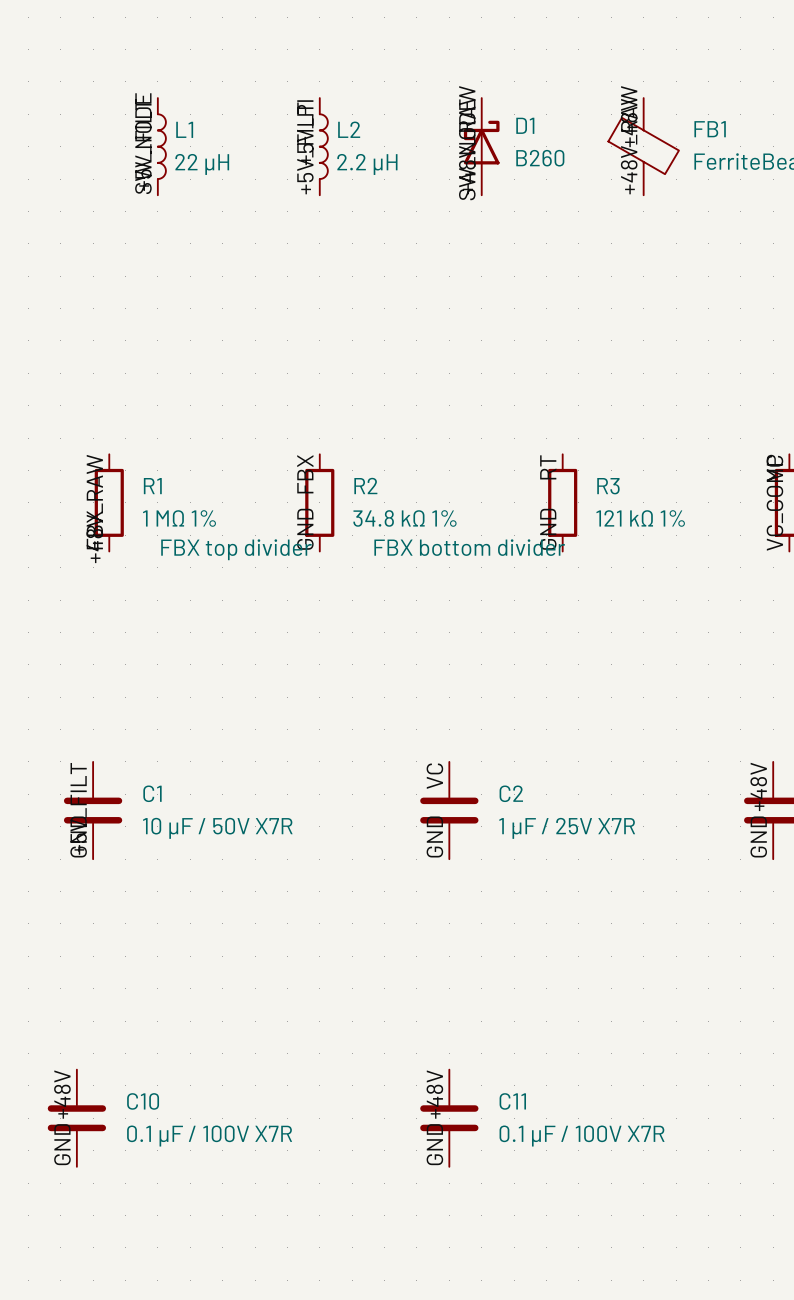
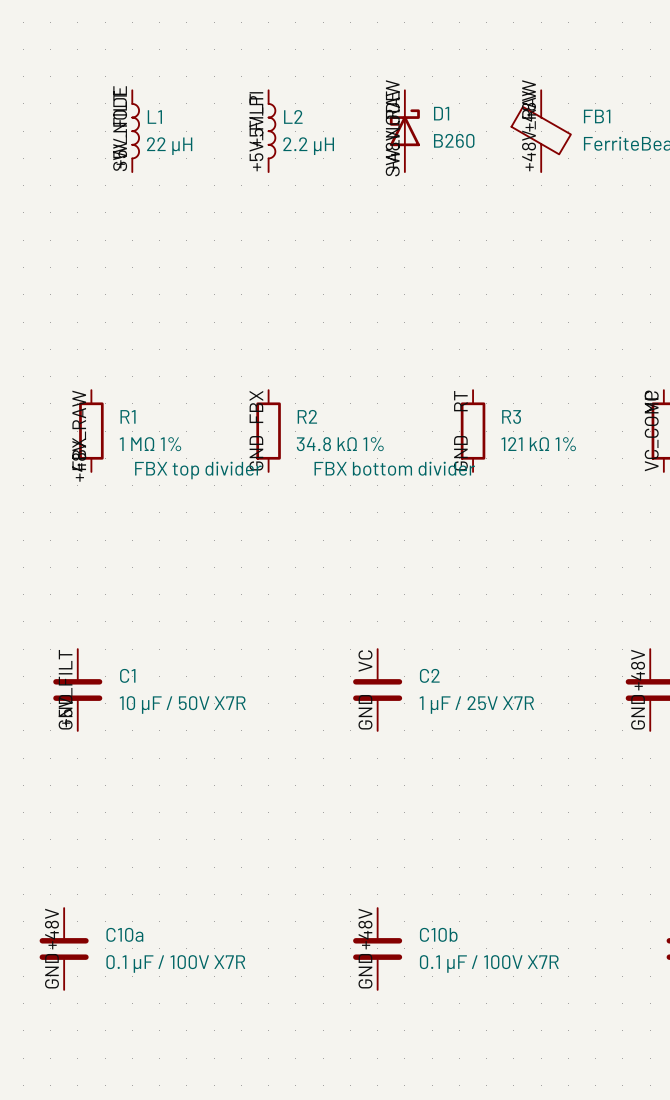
C10 name: C10 (143, 1101) -> C10a (124, 934)
C11 name: C11 (512, 1101) -> C10b (438, 934)

